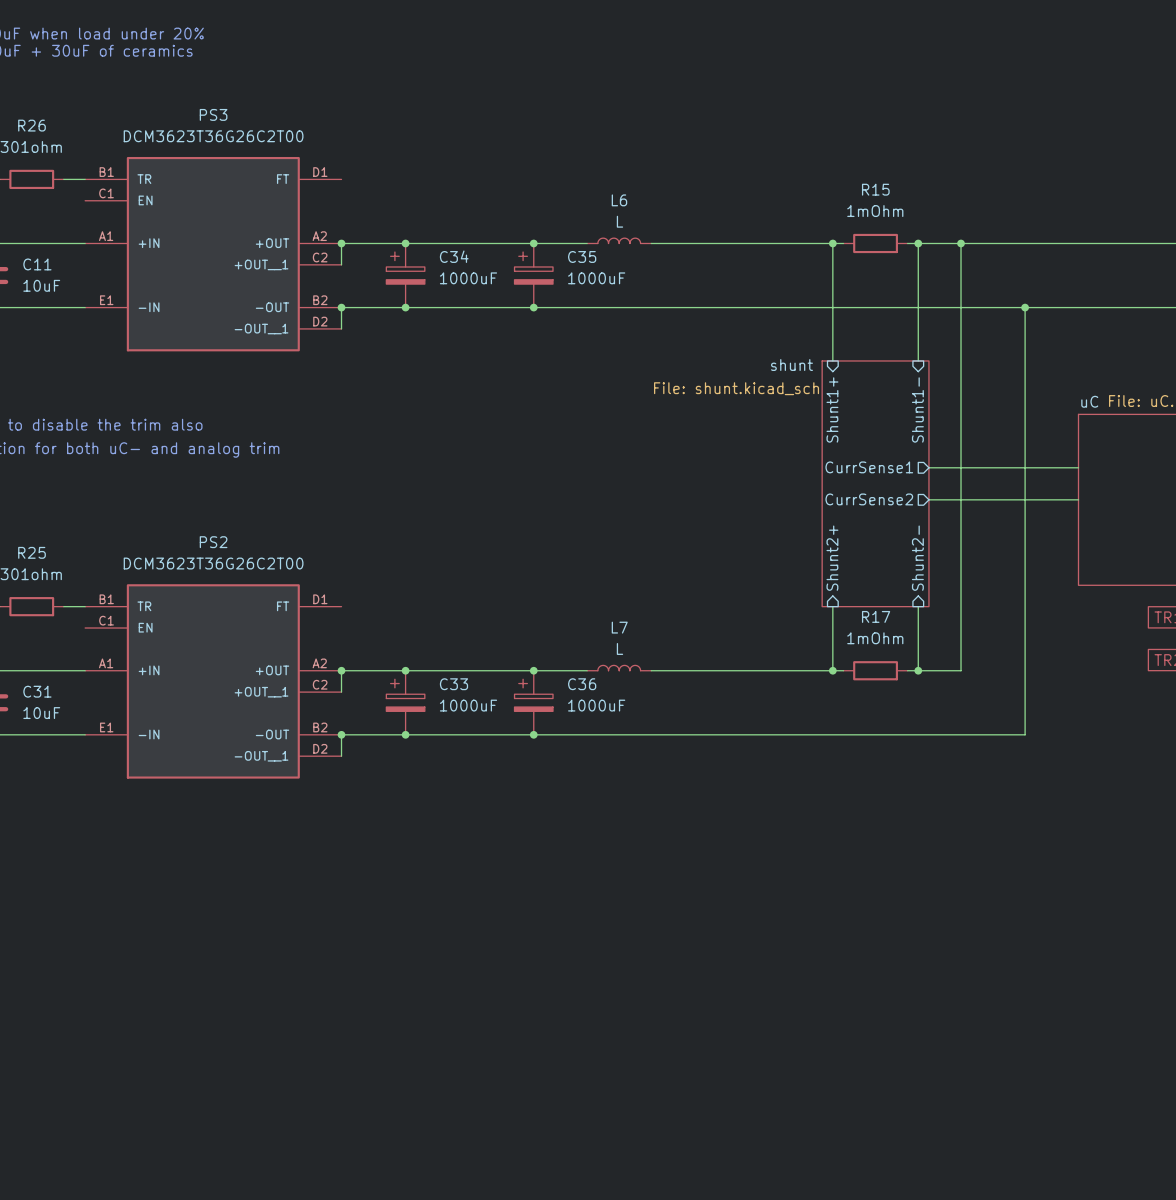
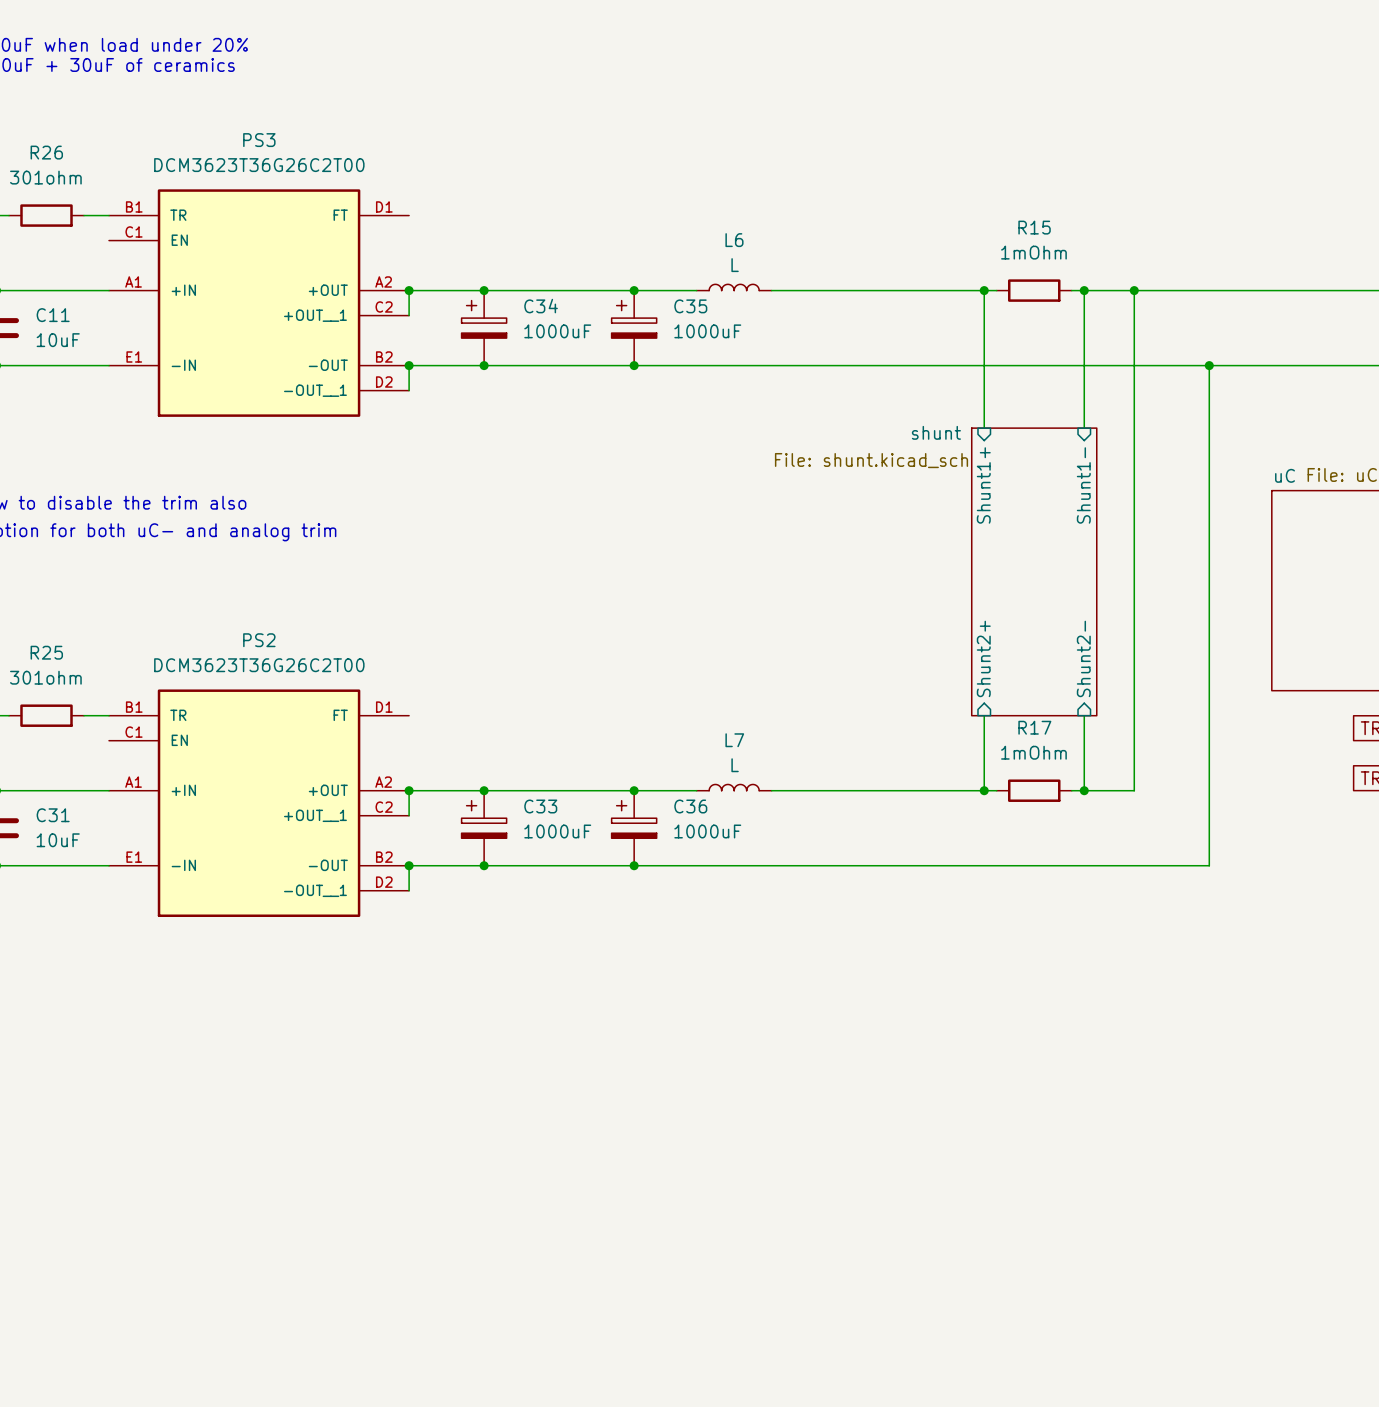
sheet pin: CurrSense1 (869, 467) -> none
wire: (928, 467) (1078, 467) -> none
sheet pin: CurrSense2 (869, 499) -> none
wire: (928, 499) (1078, 499) -> none

